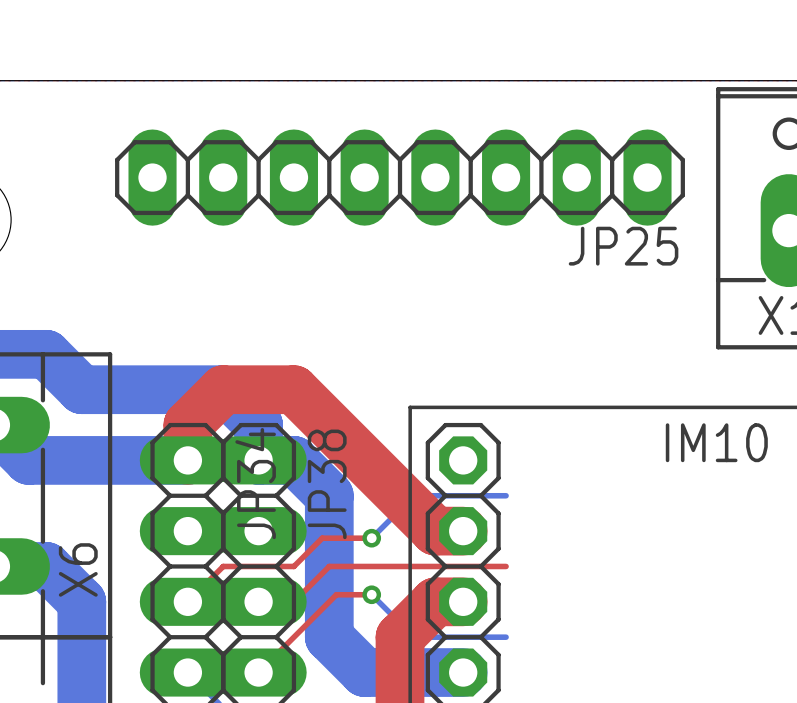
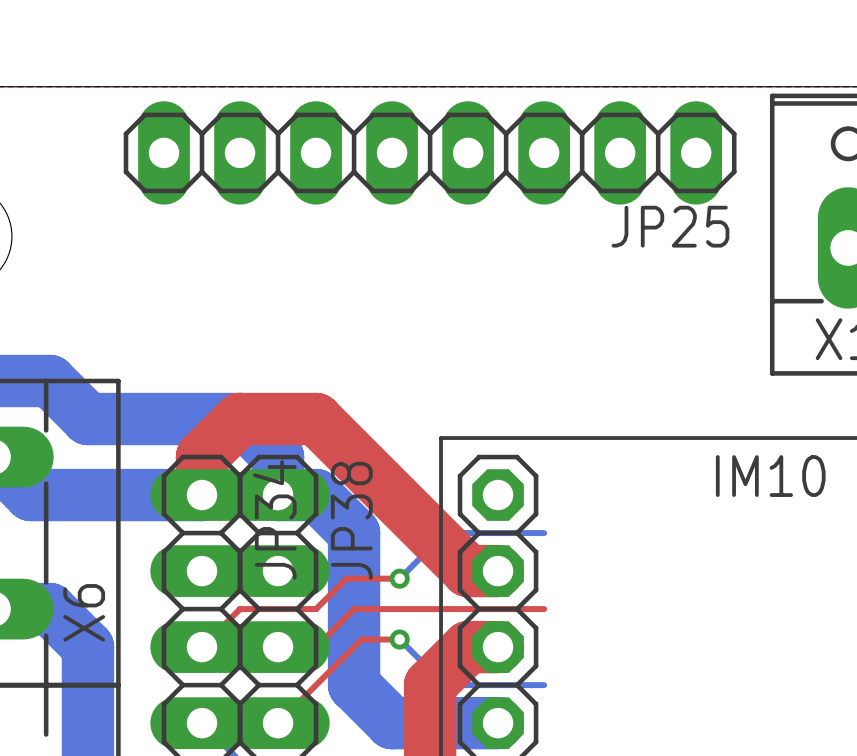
JP25 position: (400, 177) -> (430, 152)

